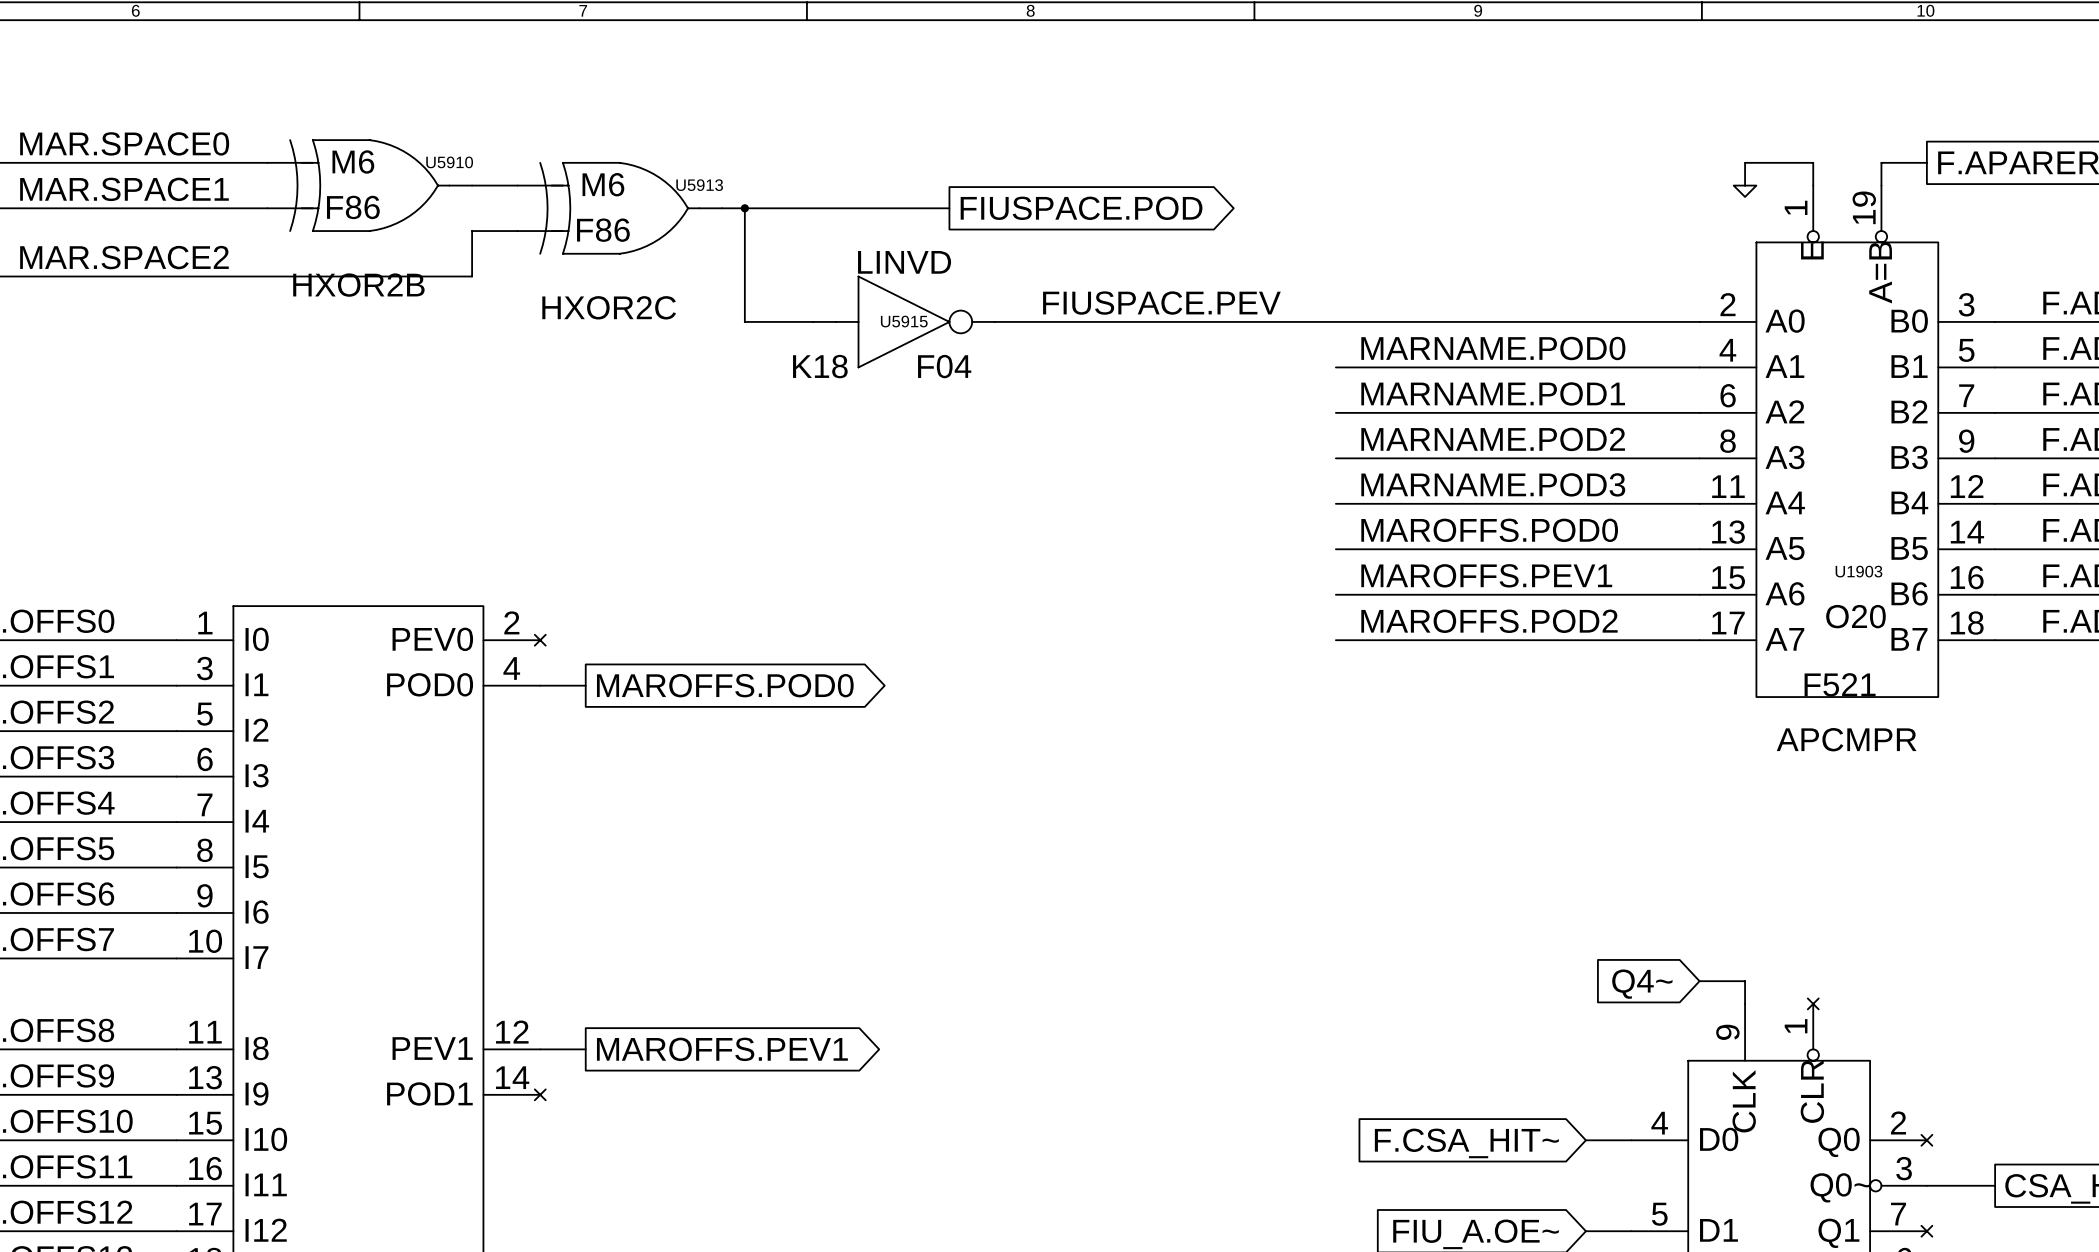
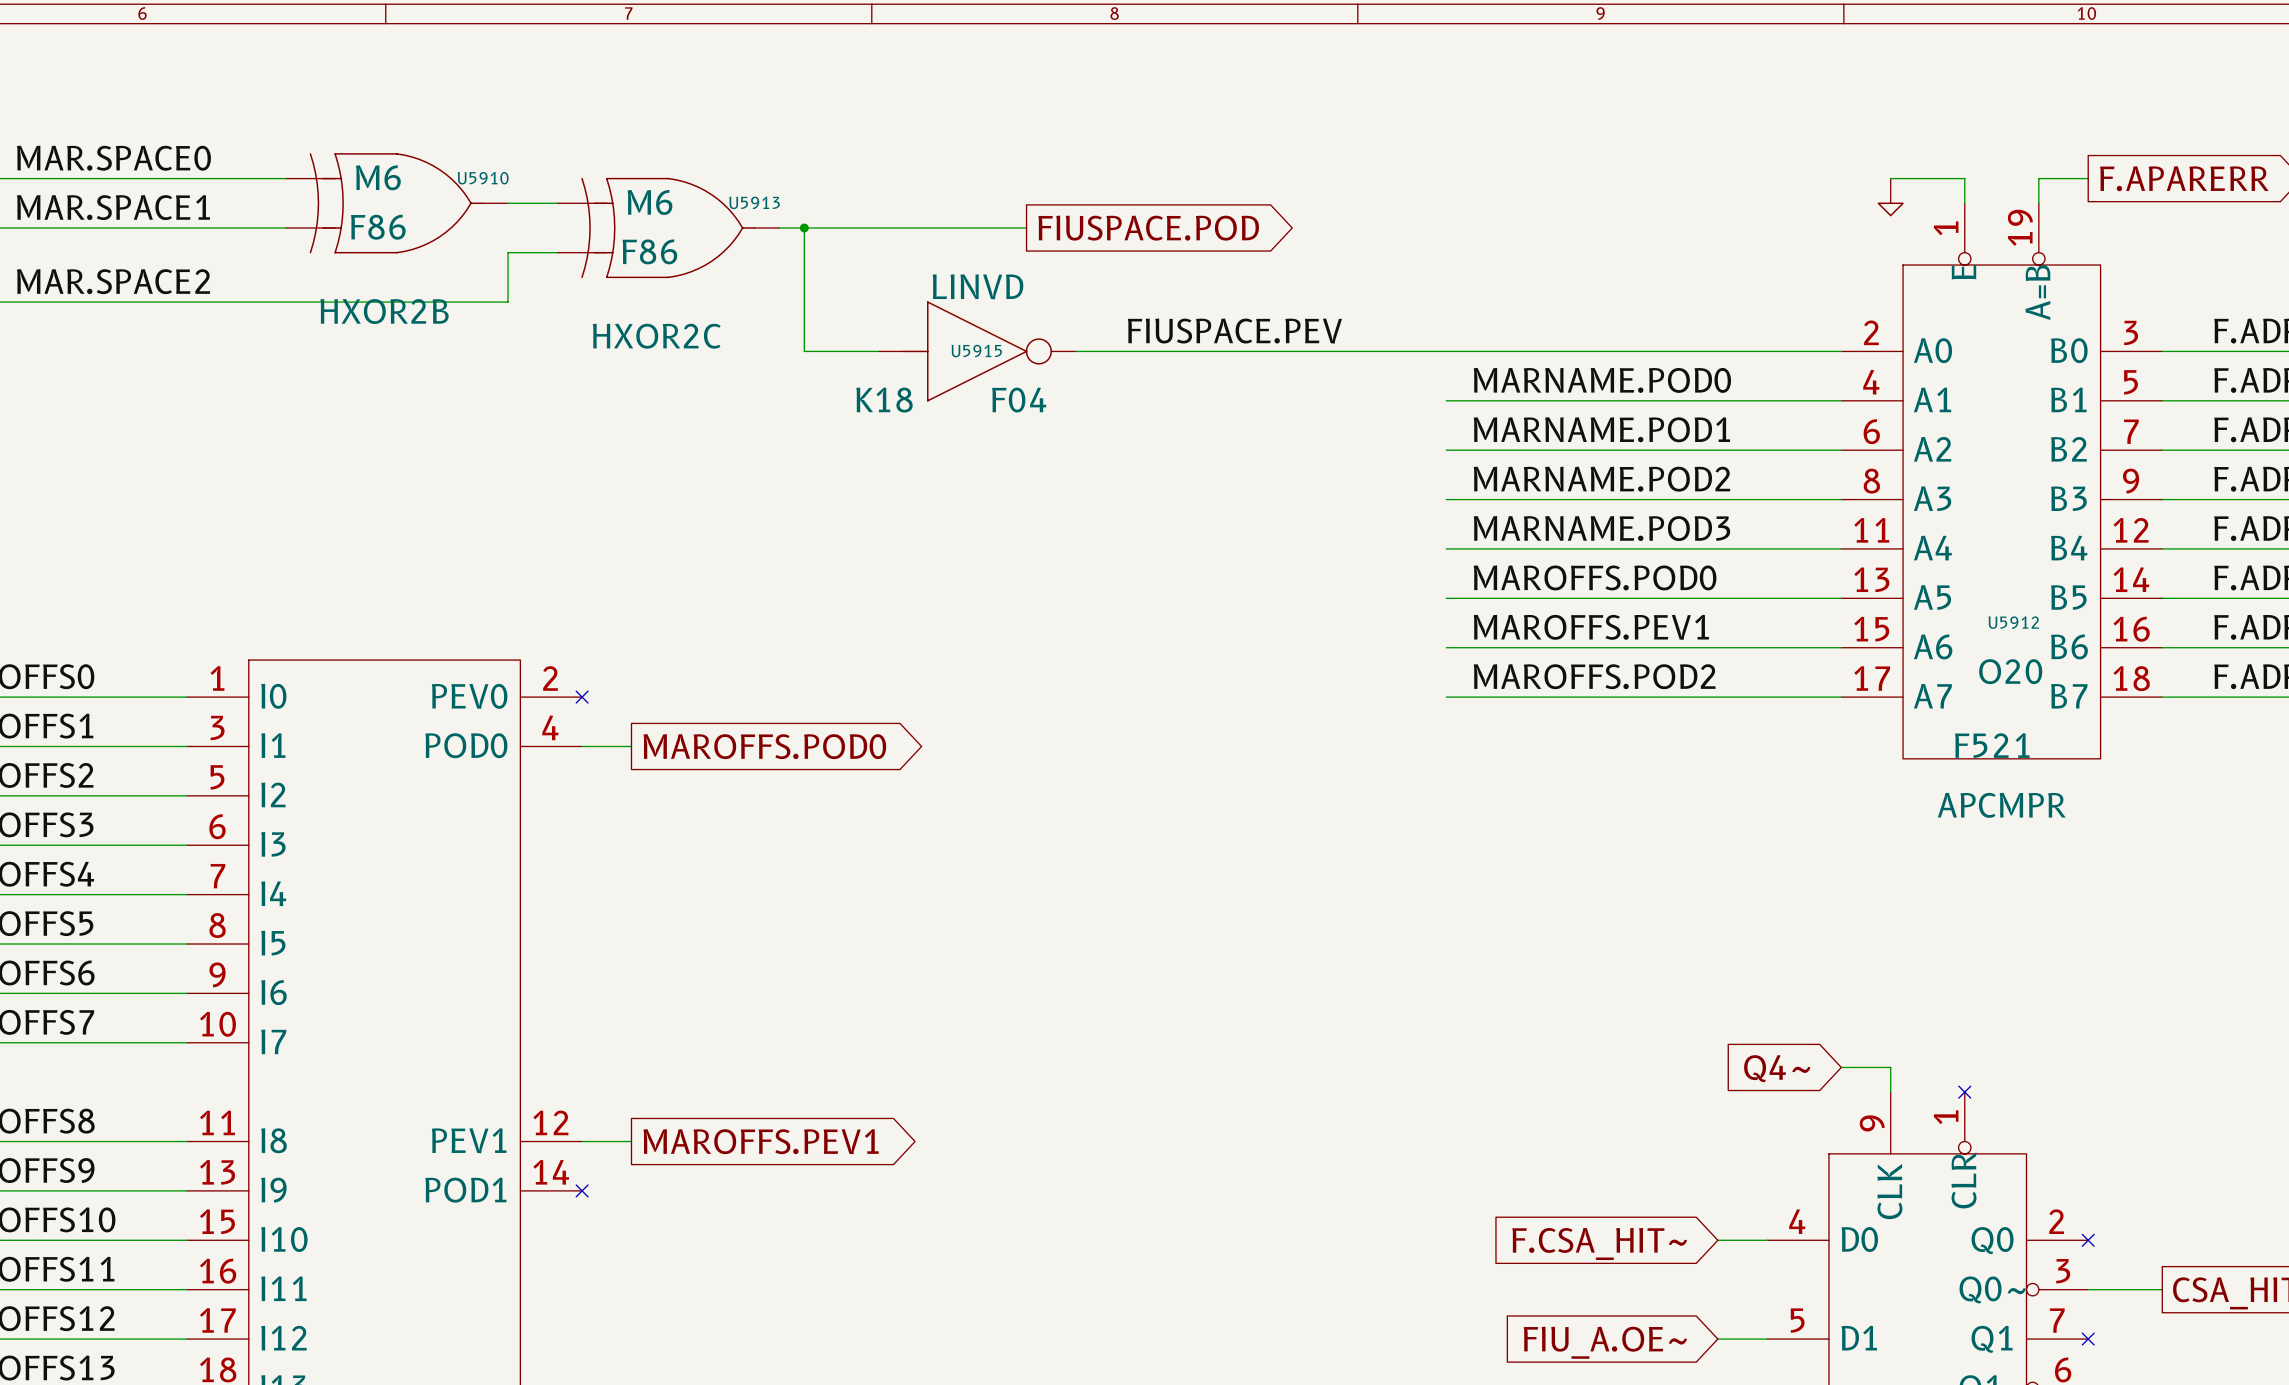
U1903 name: U1903 (1858, 571) -> U5912 (2013, 622)

